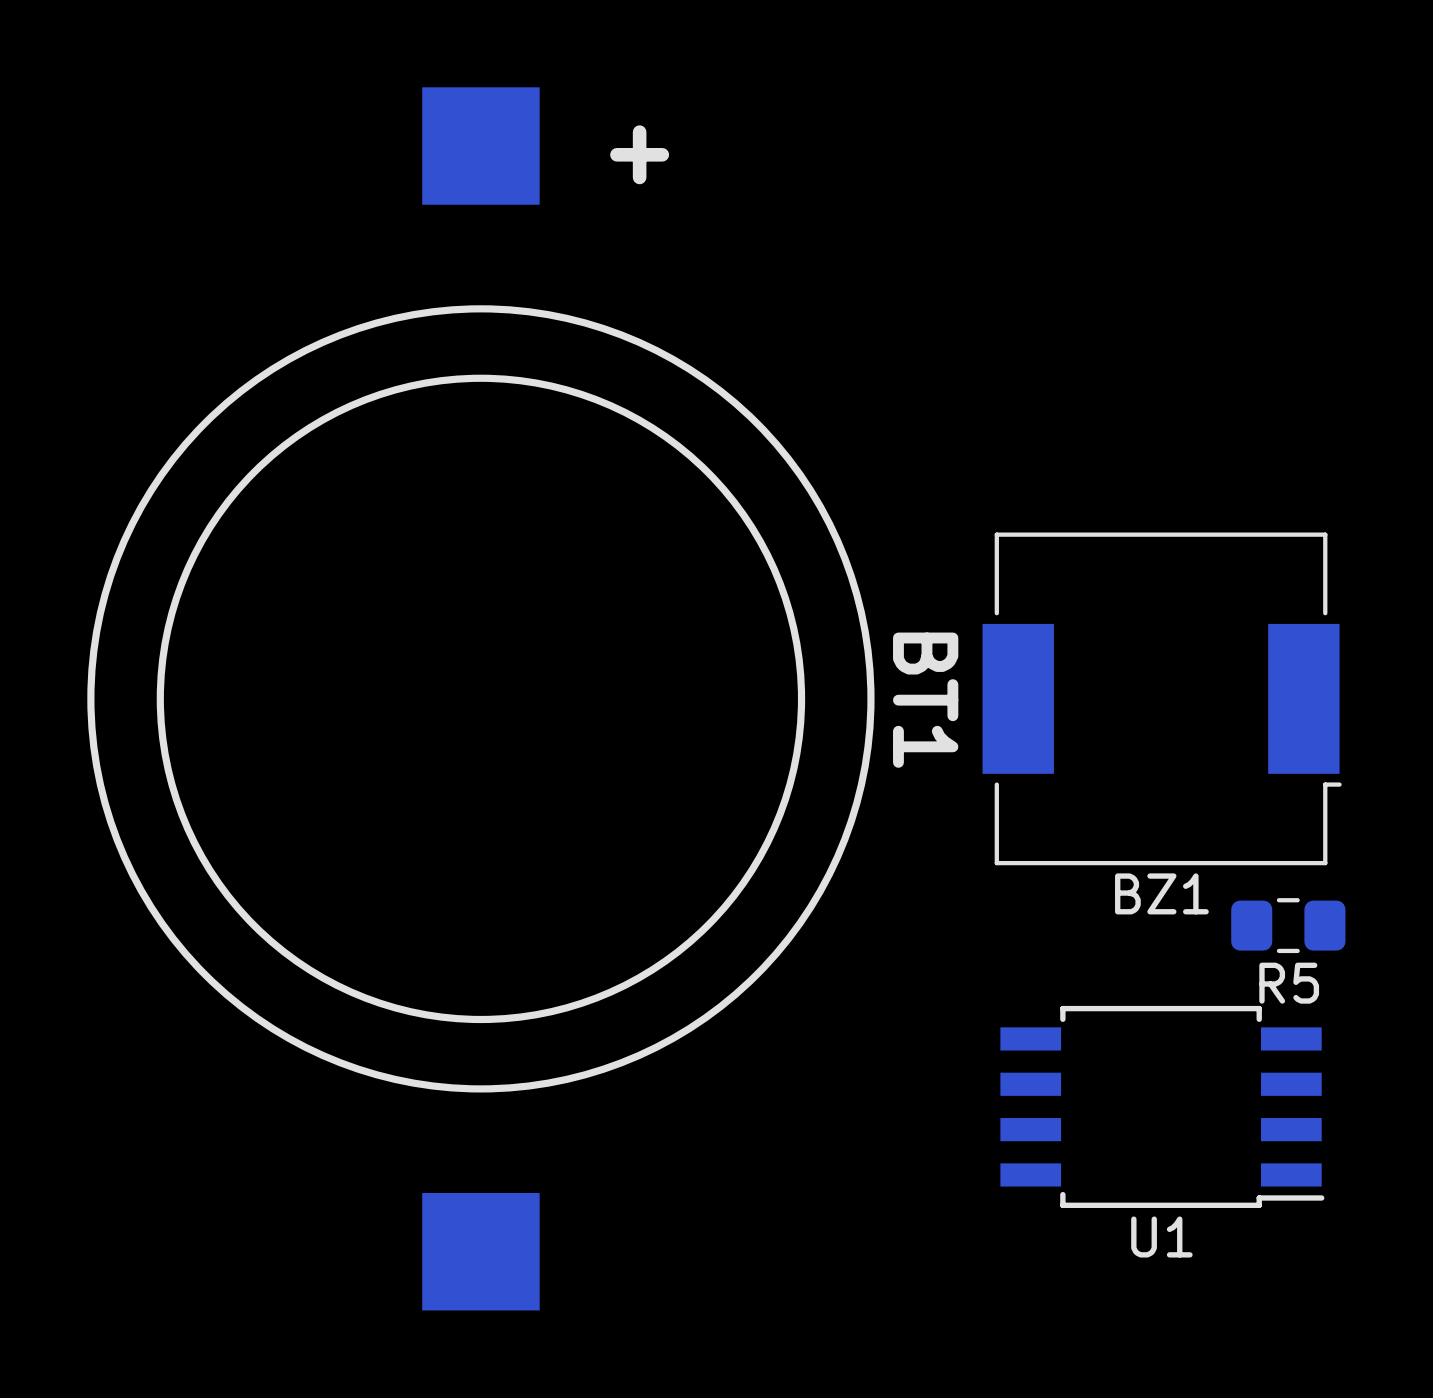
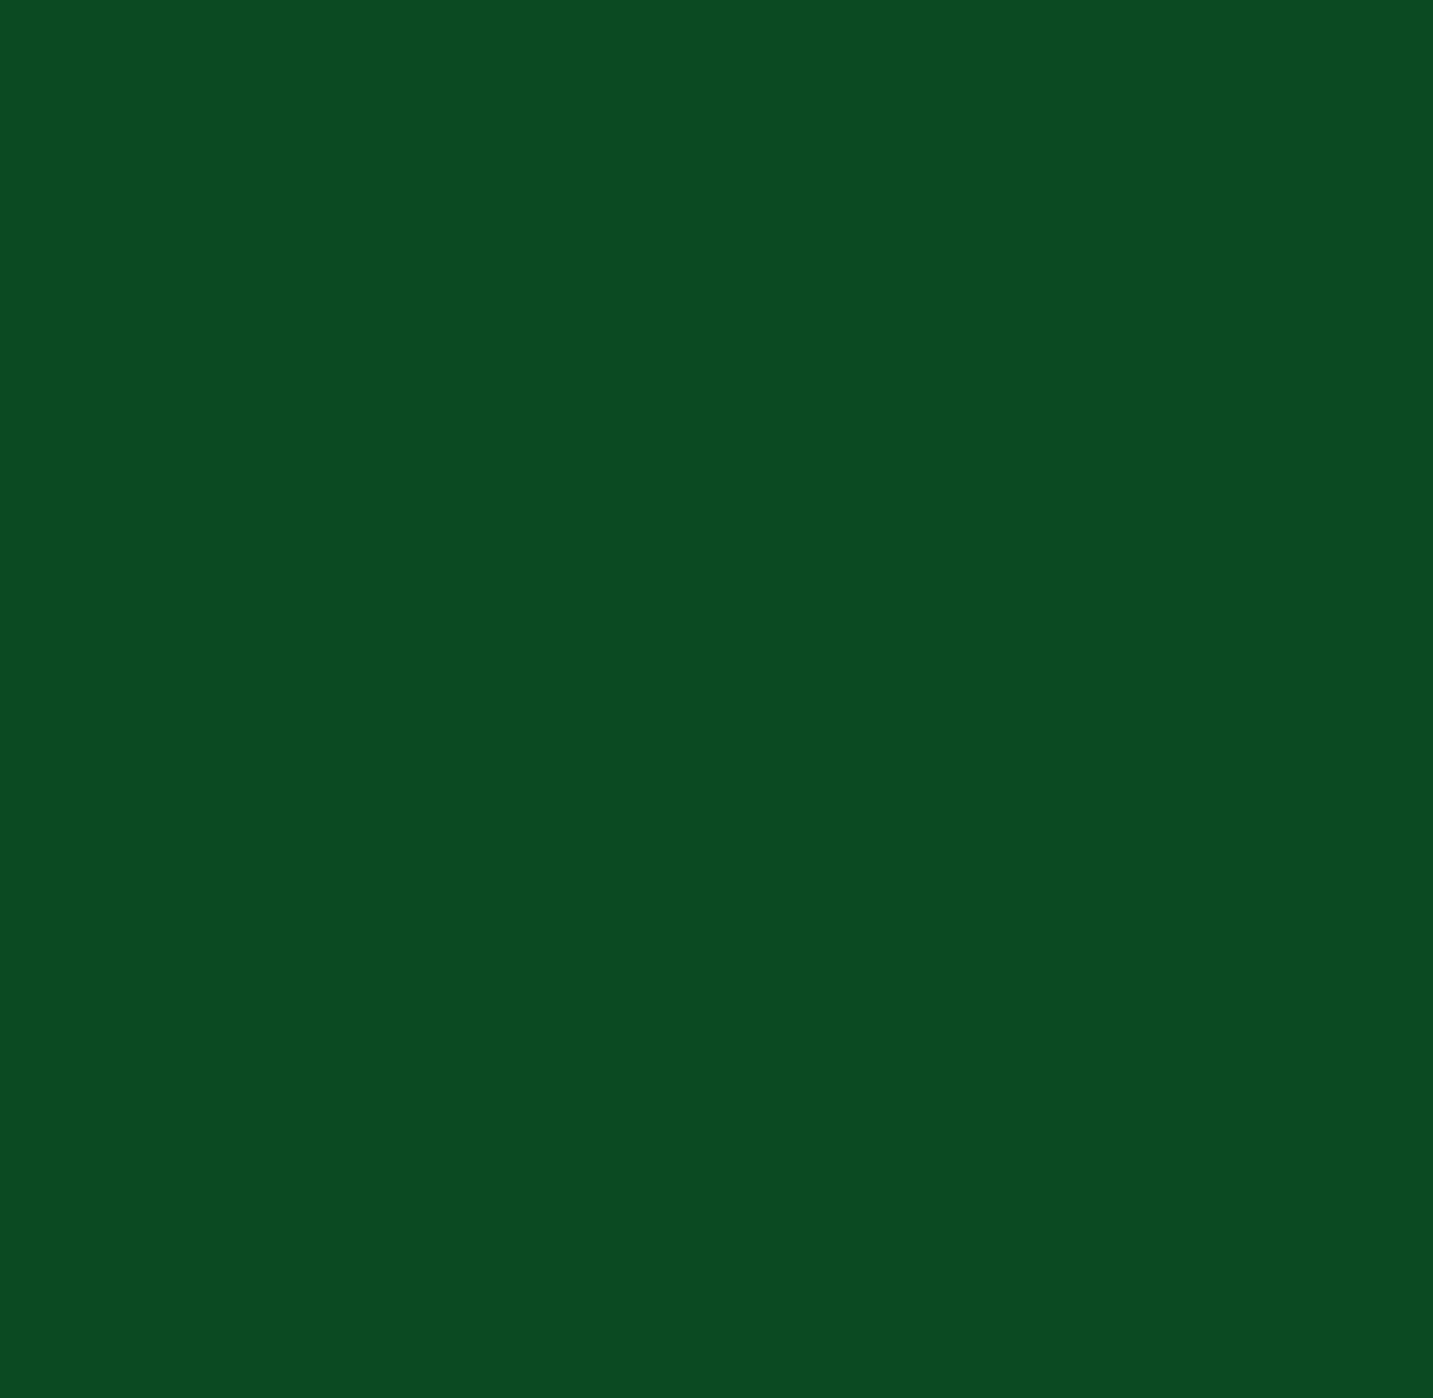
BT1: (480, 698) -> none
BZ1: (1162, 698) -> none
R5: (1288, 925) -> none
U1: (1162, 1106) -> none

